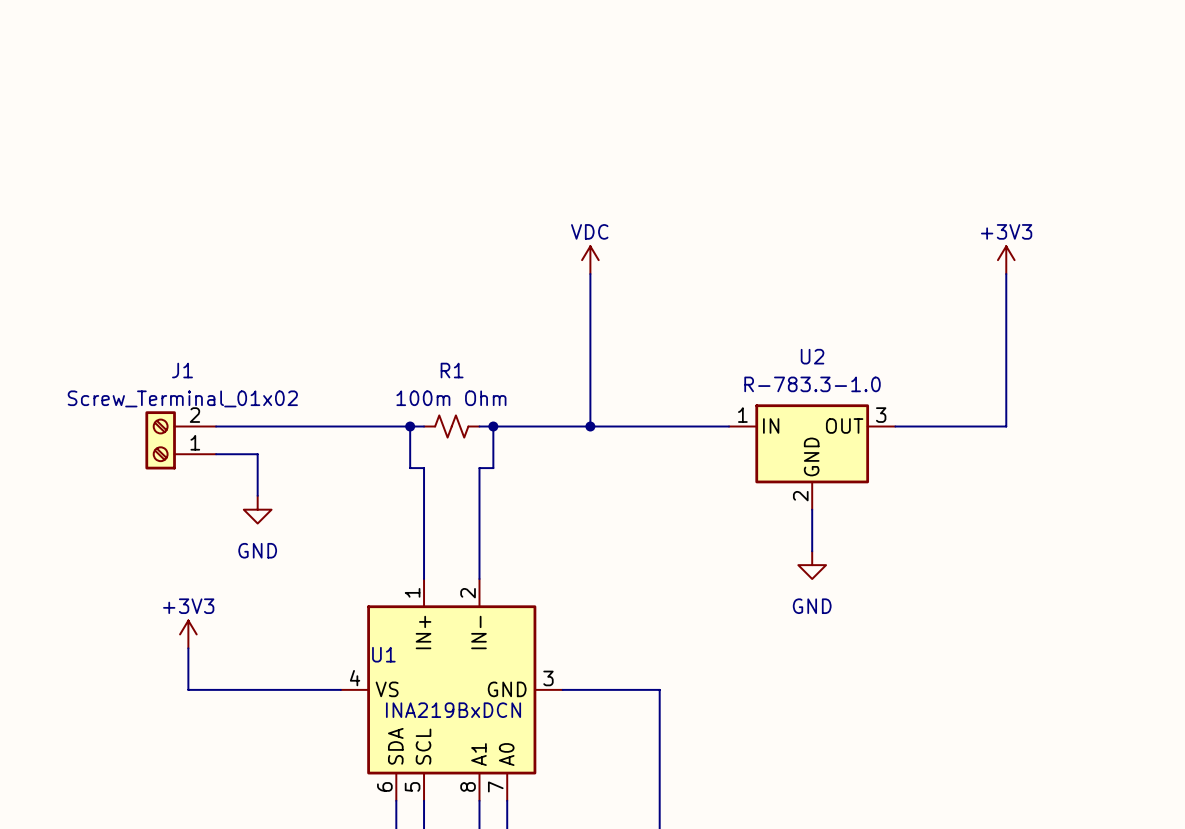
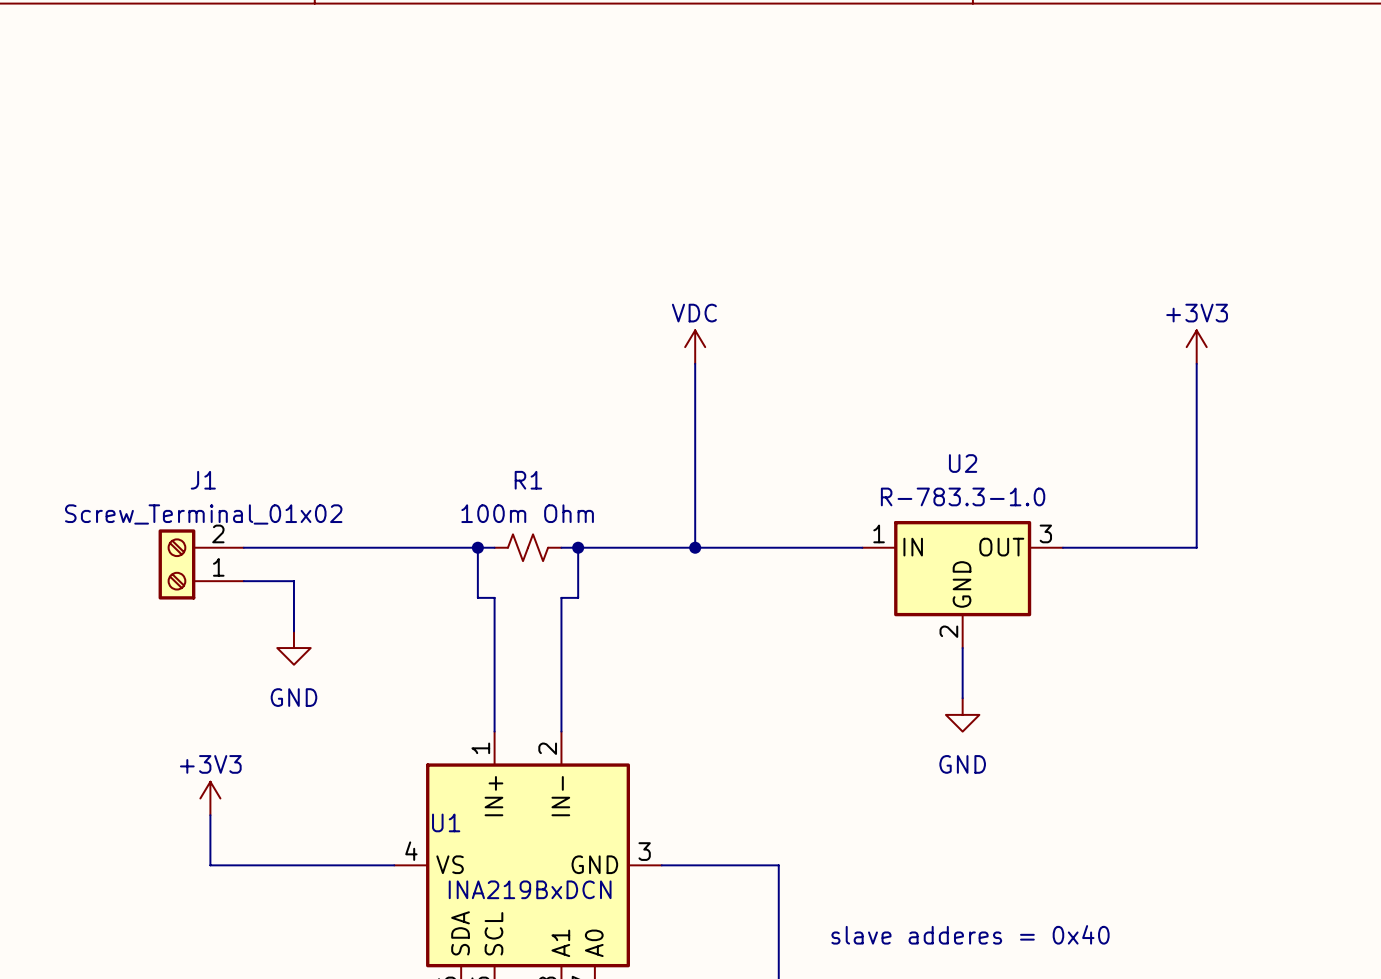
text: none -> slave adderes = 0x40 (970, 934)

